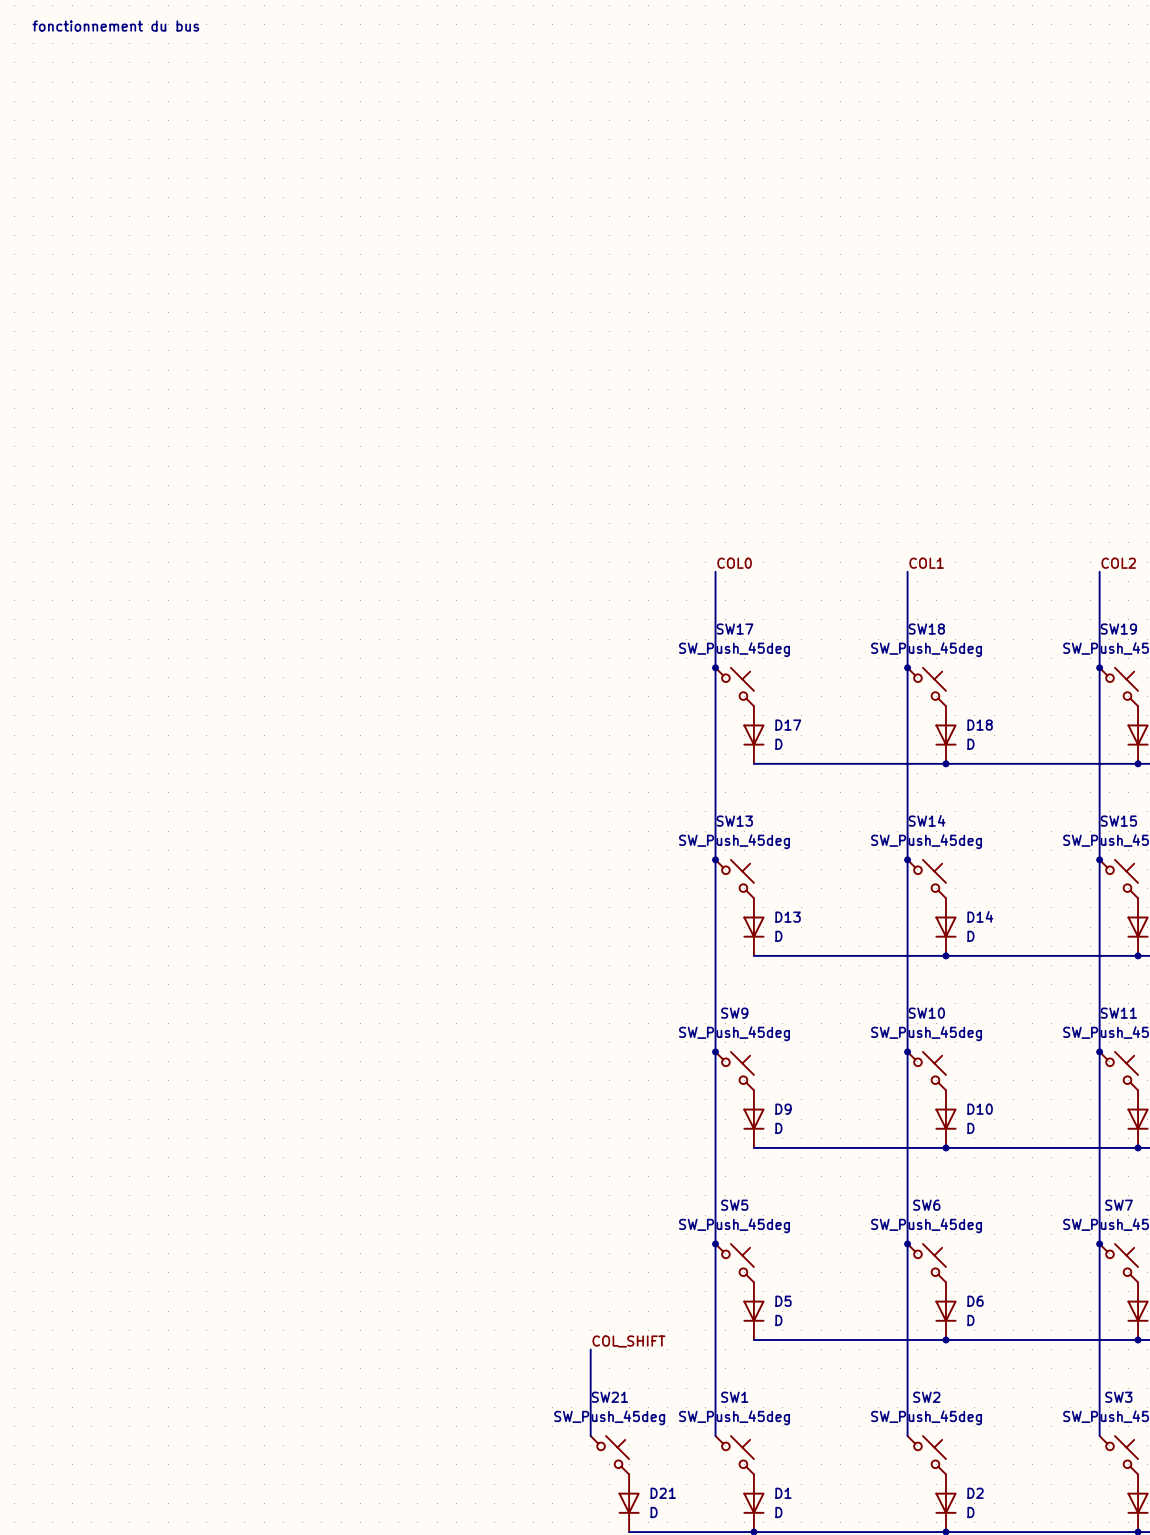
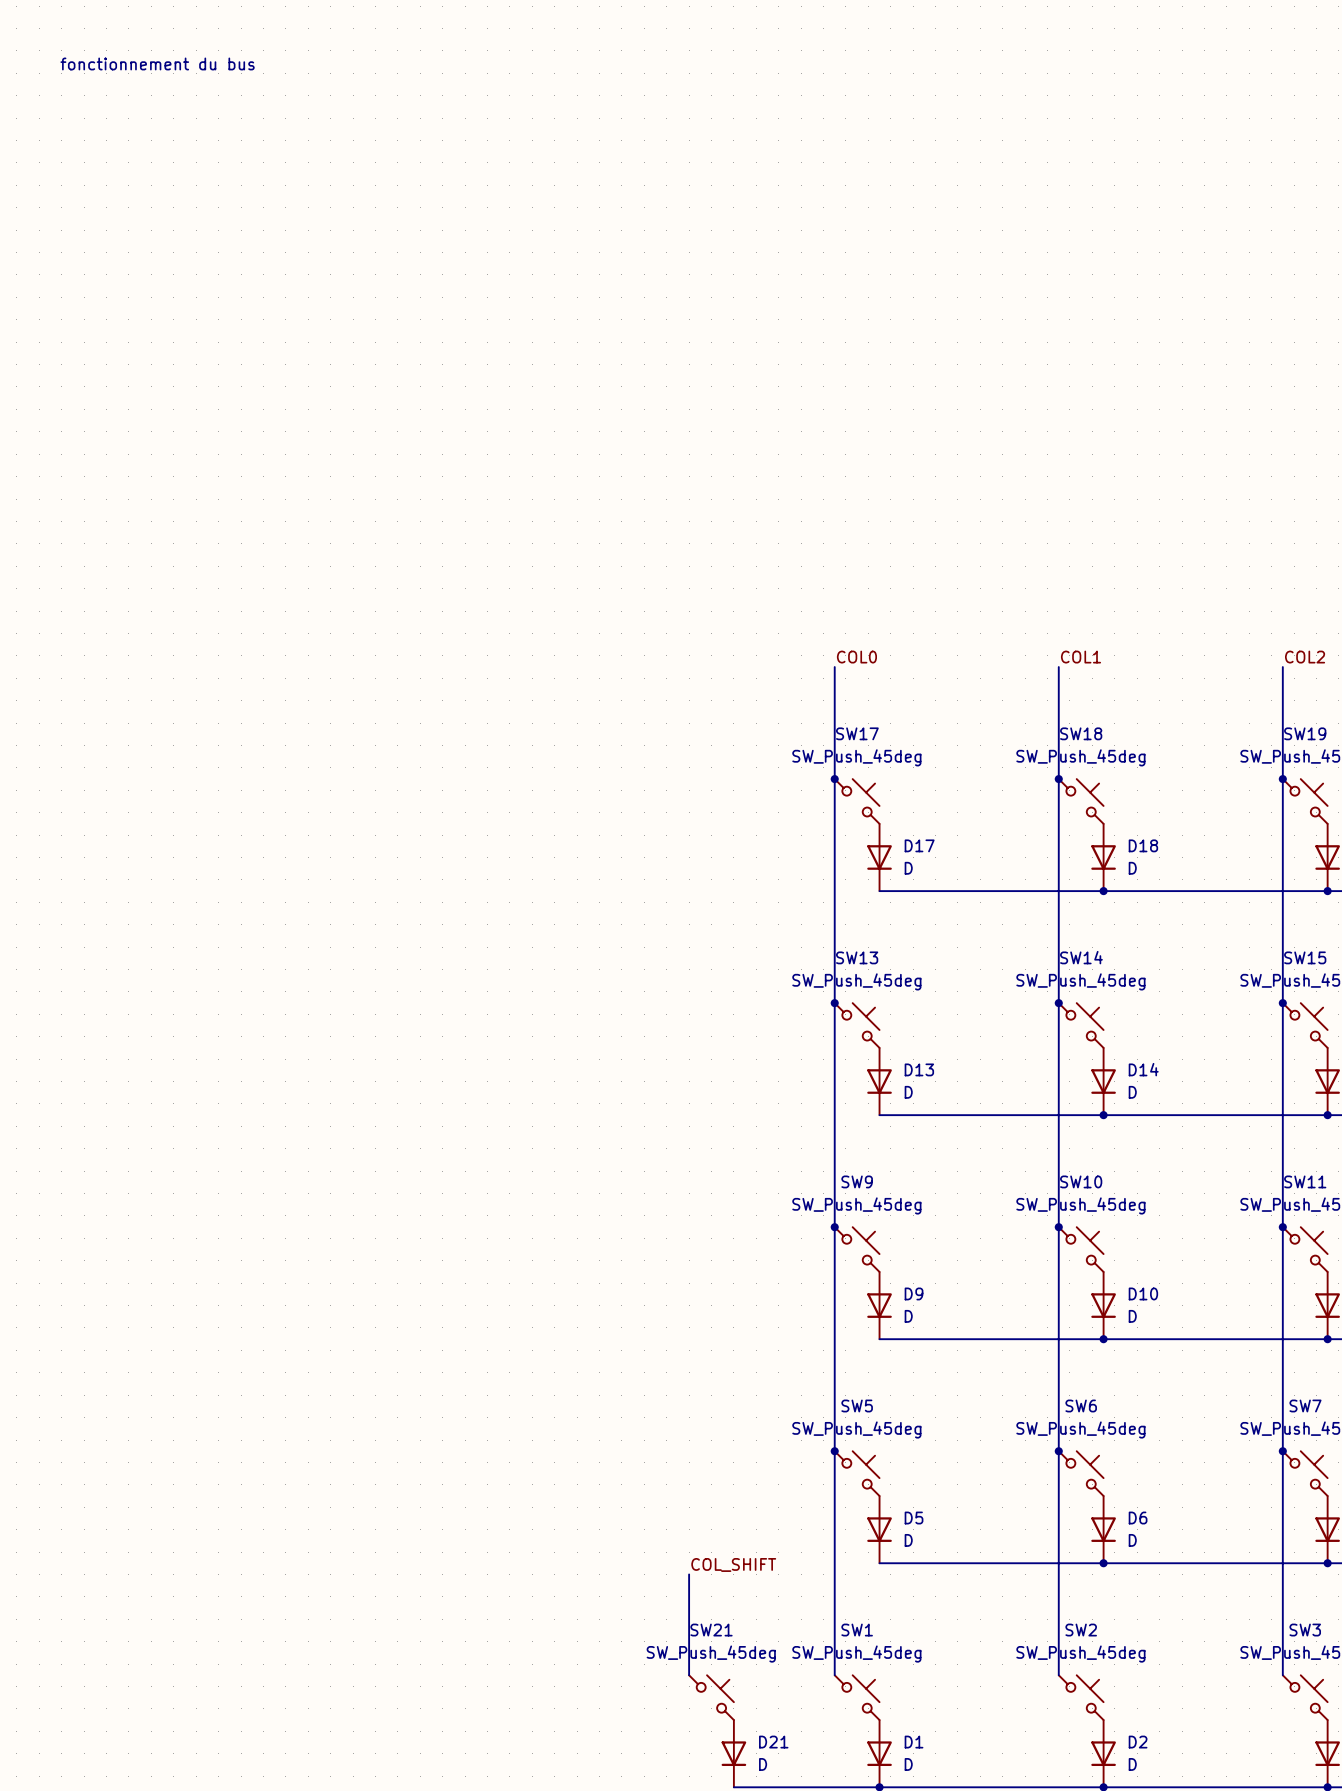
text position: fonctionnement du bus (115, 26) -> fonctionnement du bus (157, 63)

